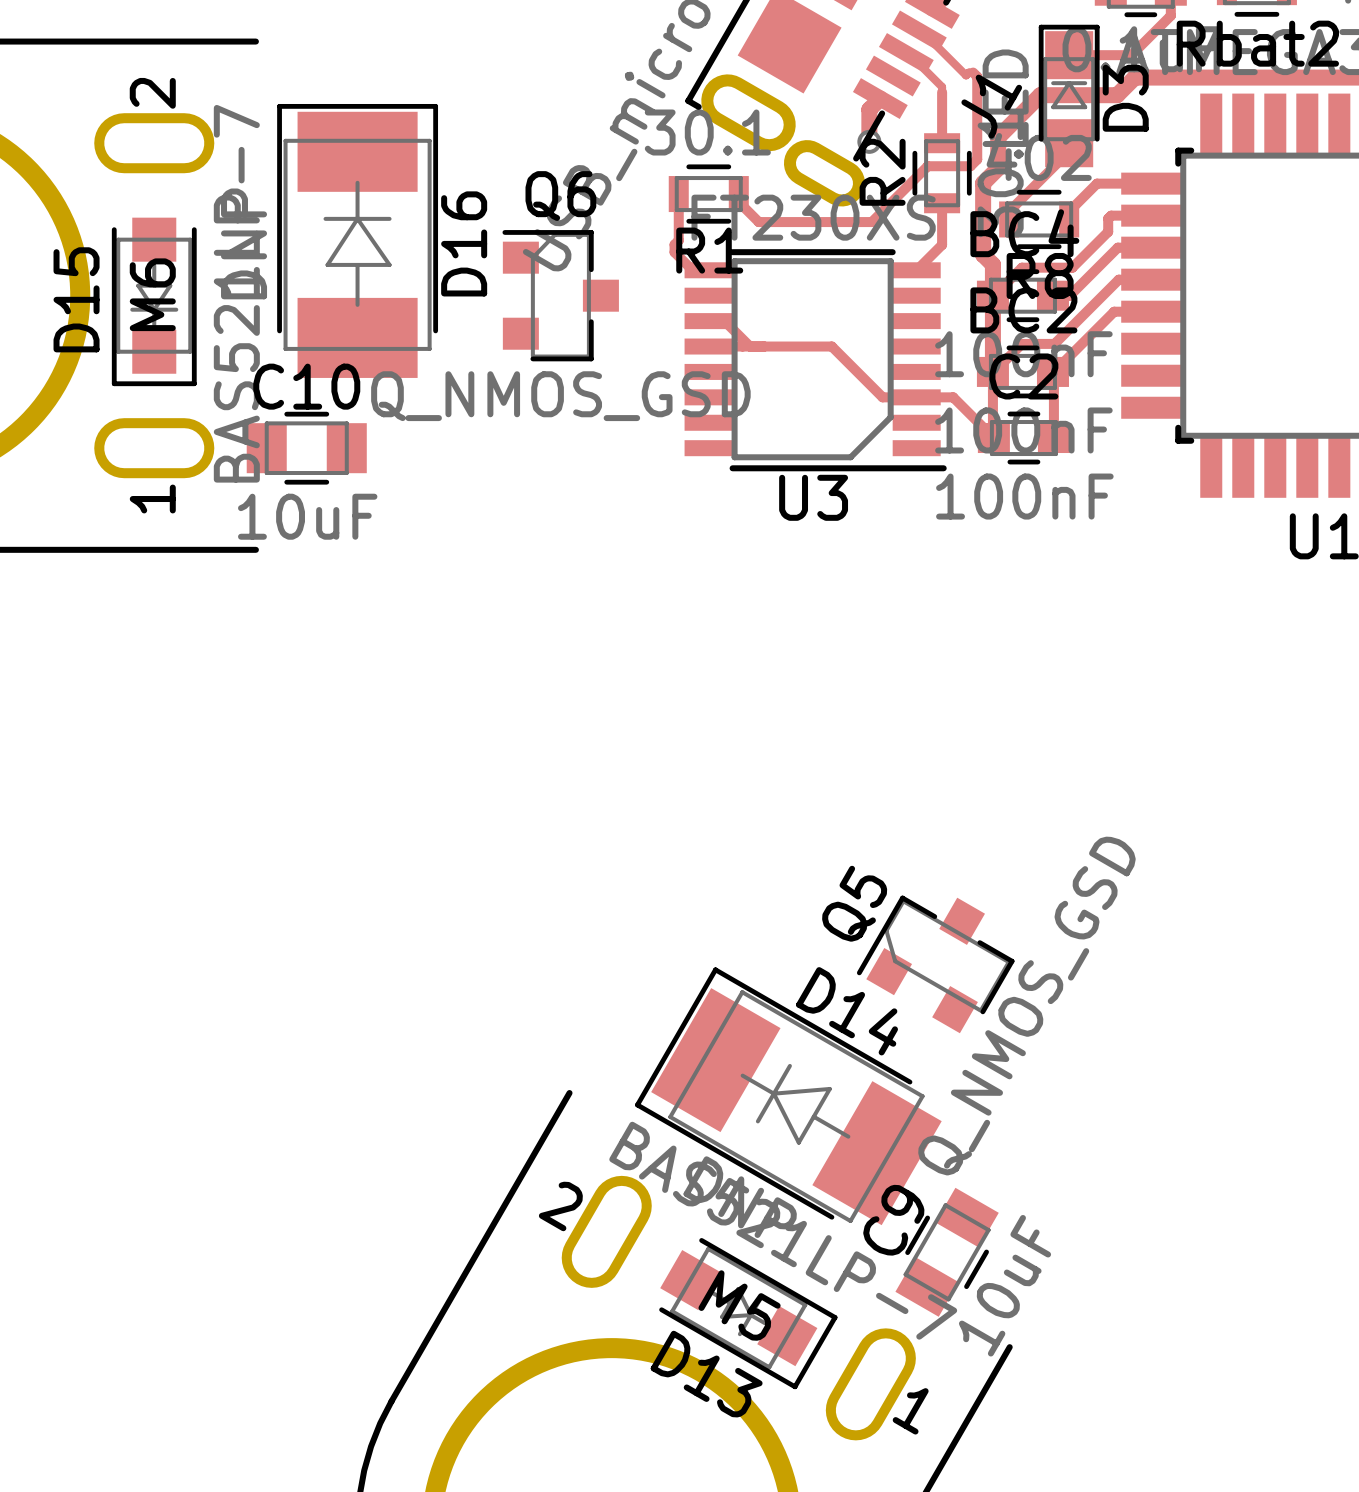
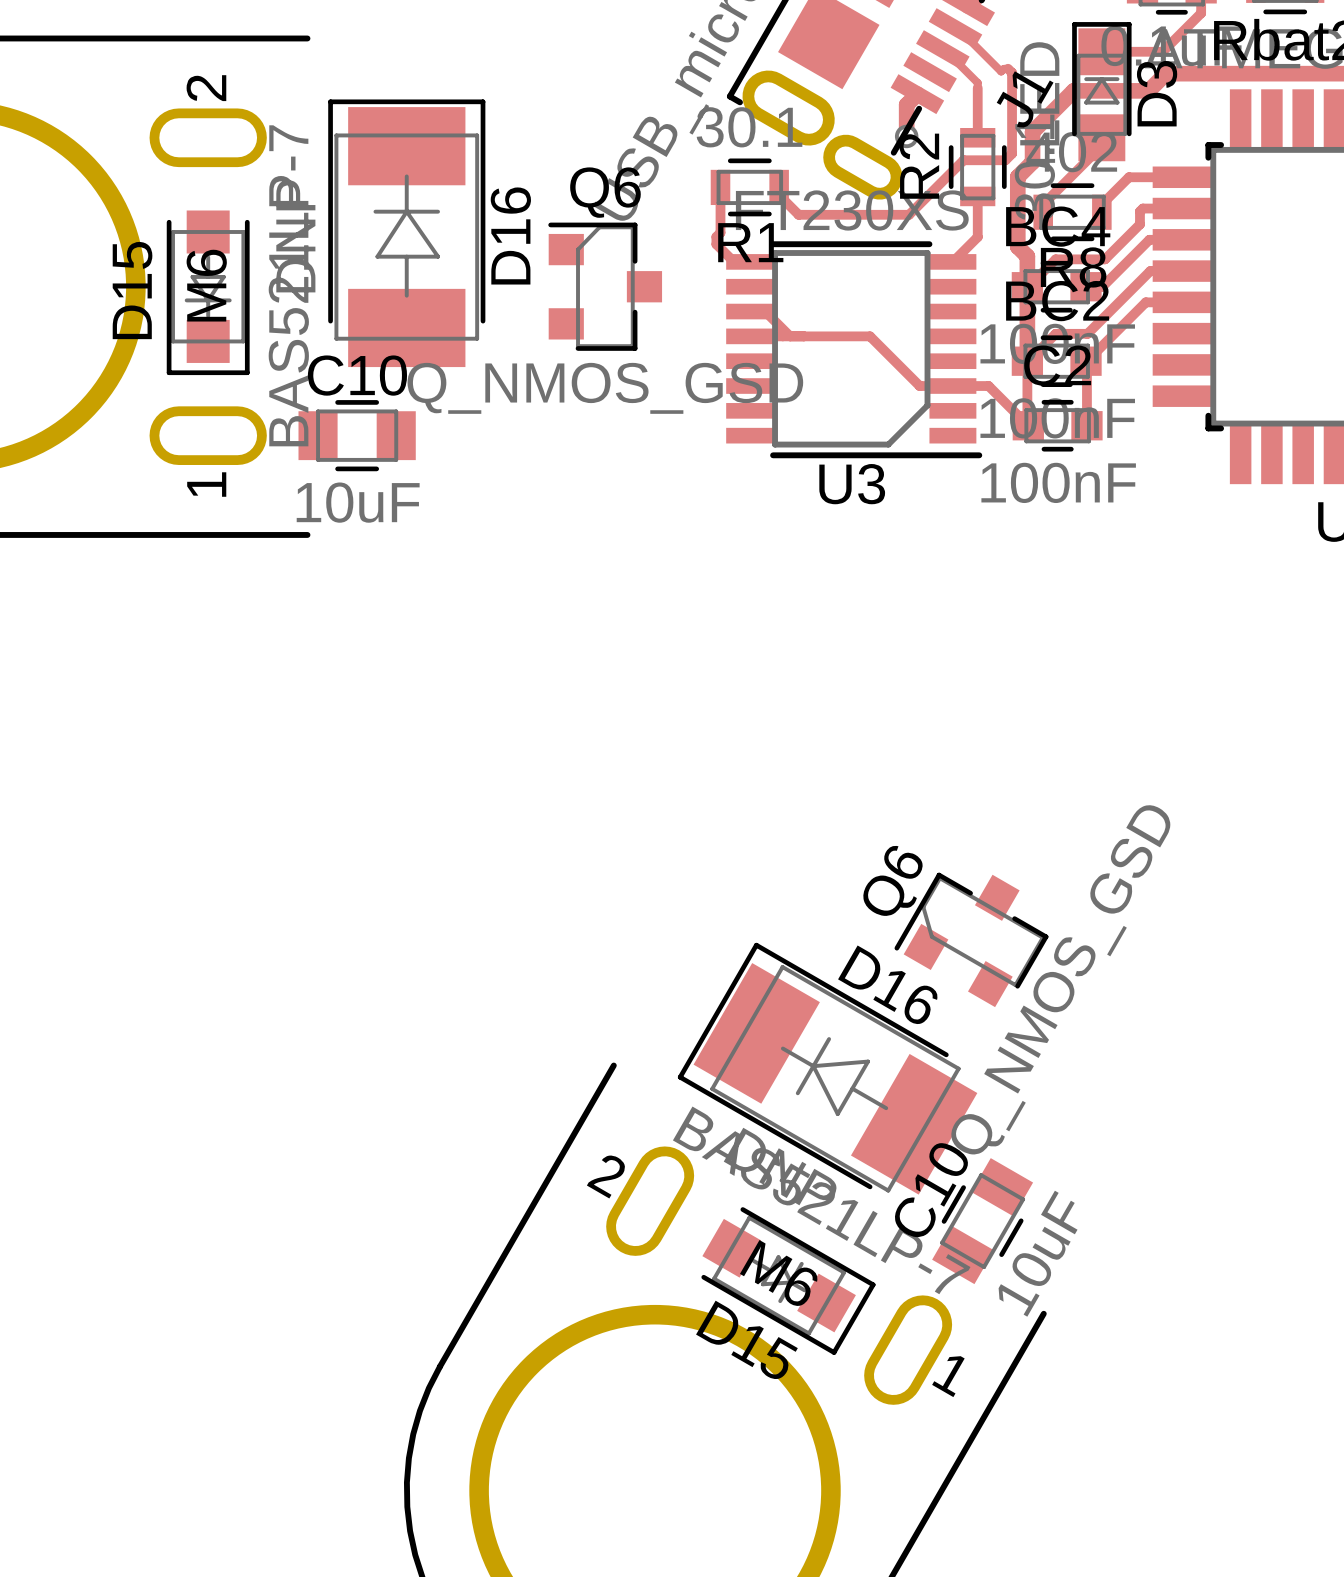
Q5 name: Q5 (854, 903) -> Q6 (892, 880)
D14 name: D14 (847, 1011) -> D16 (888, 985)
C9 name: C9 (893, 1220) -> C10 (931, 1190)
M5 name: M5 (739, 1305) -> M6 (779, 1273)
D13 name: D13 (706, 1374) -> D15 (746, 1340)

